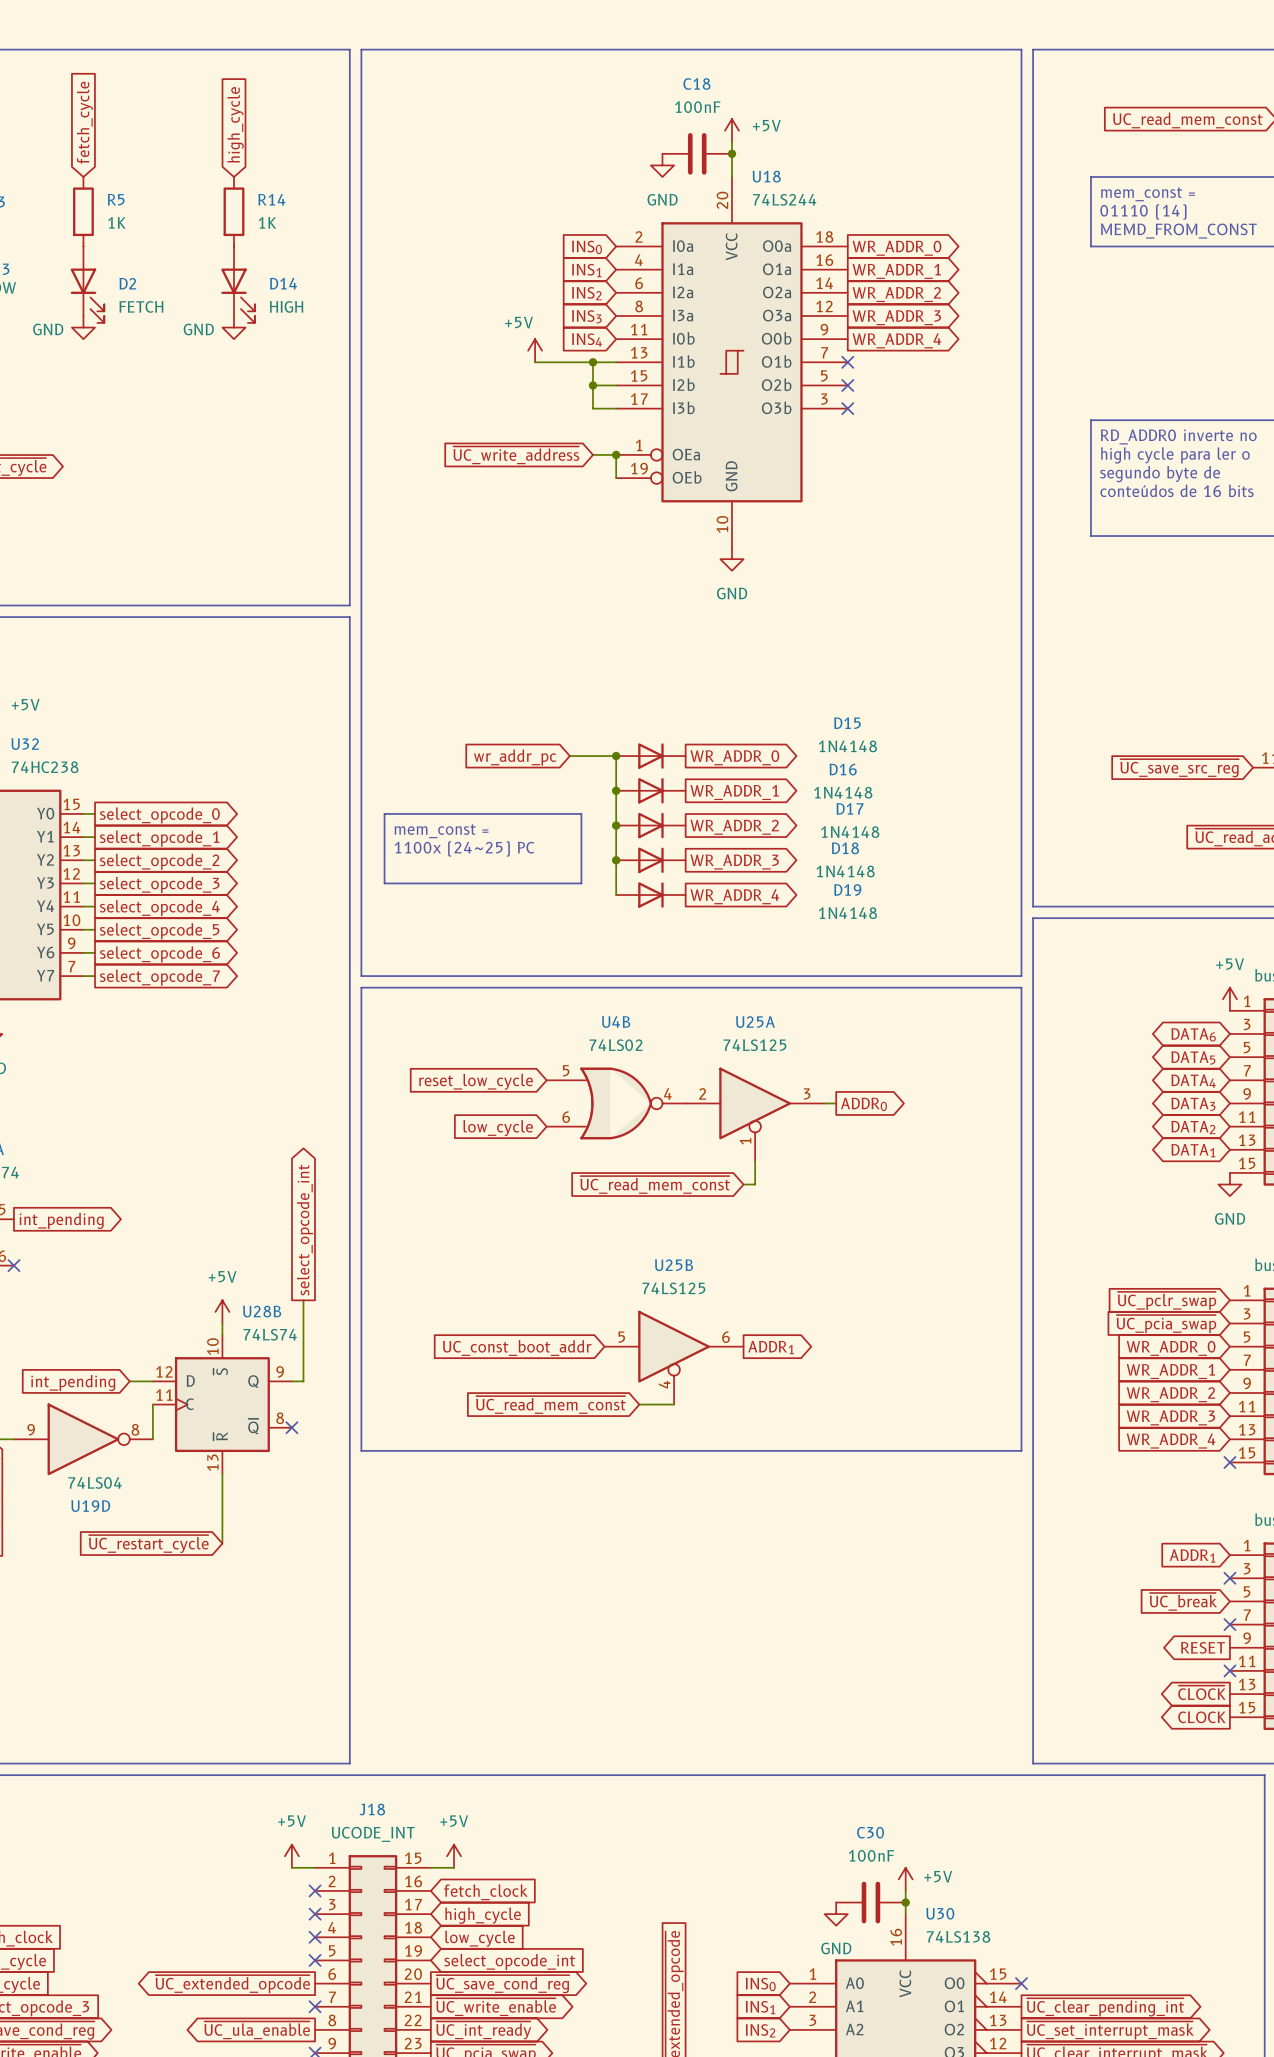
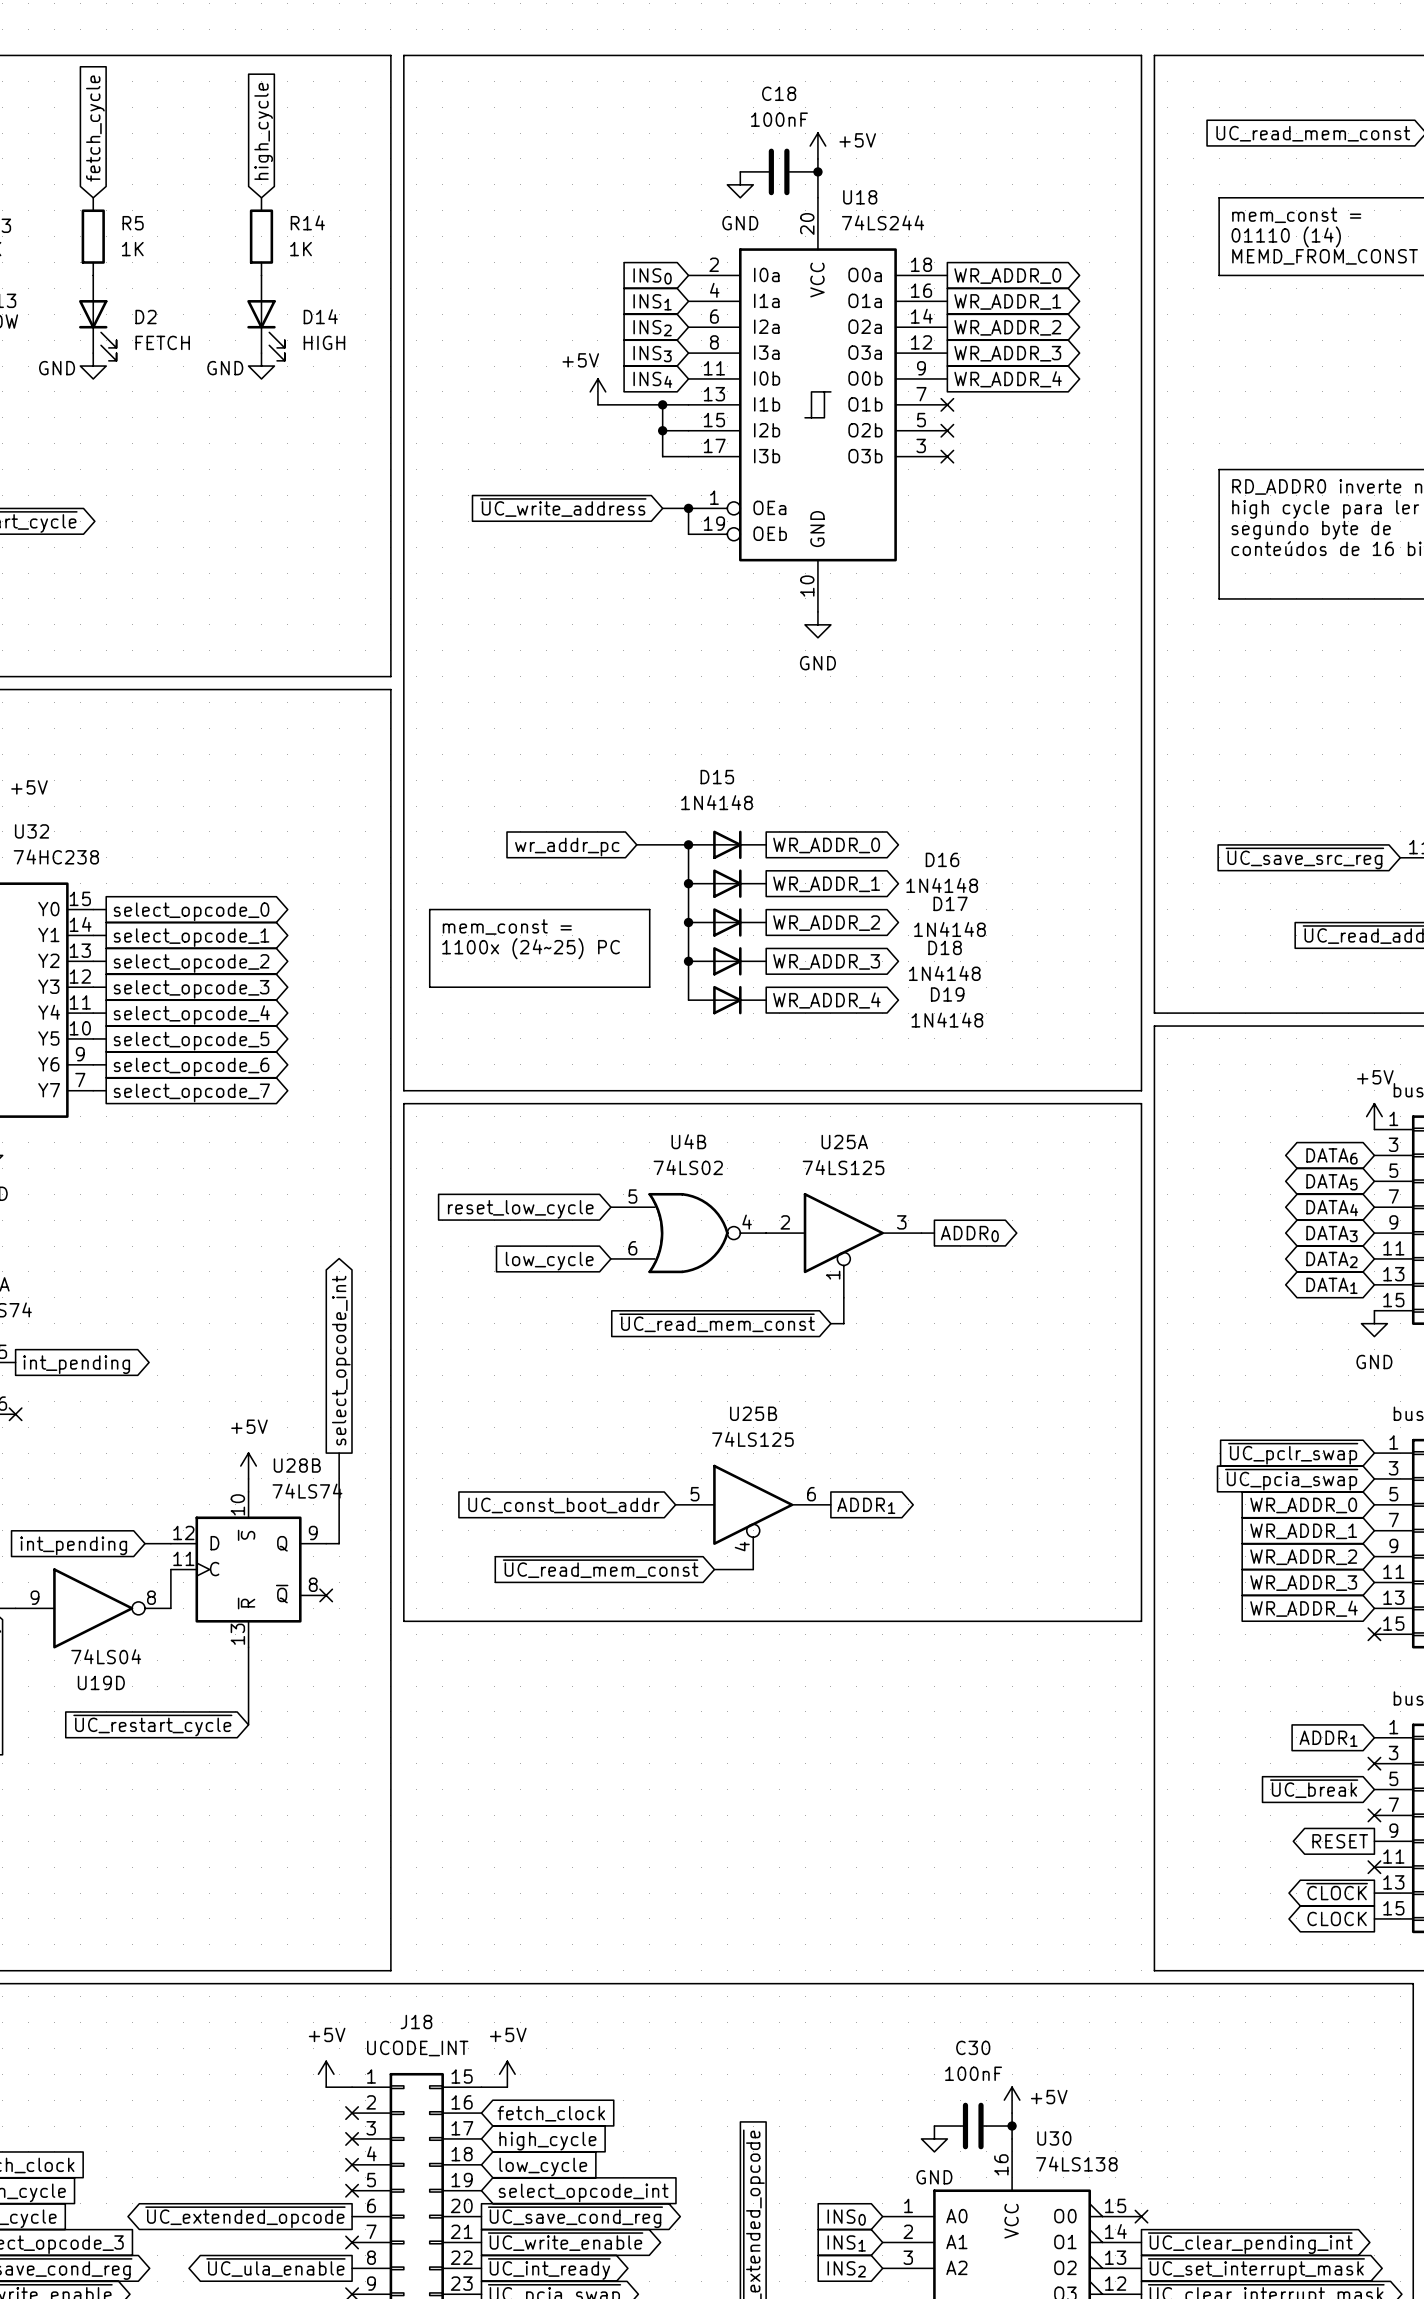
D15 name position: D15 (847, 723) -> D15 (717, 777)
D15 value position: 1N4148 (847, 746) -> 1N4148 (717, 802)

